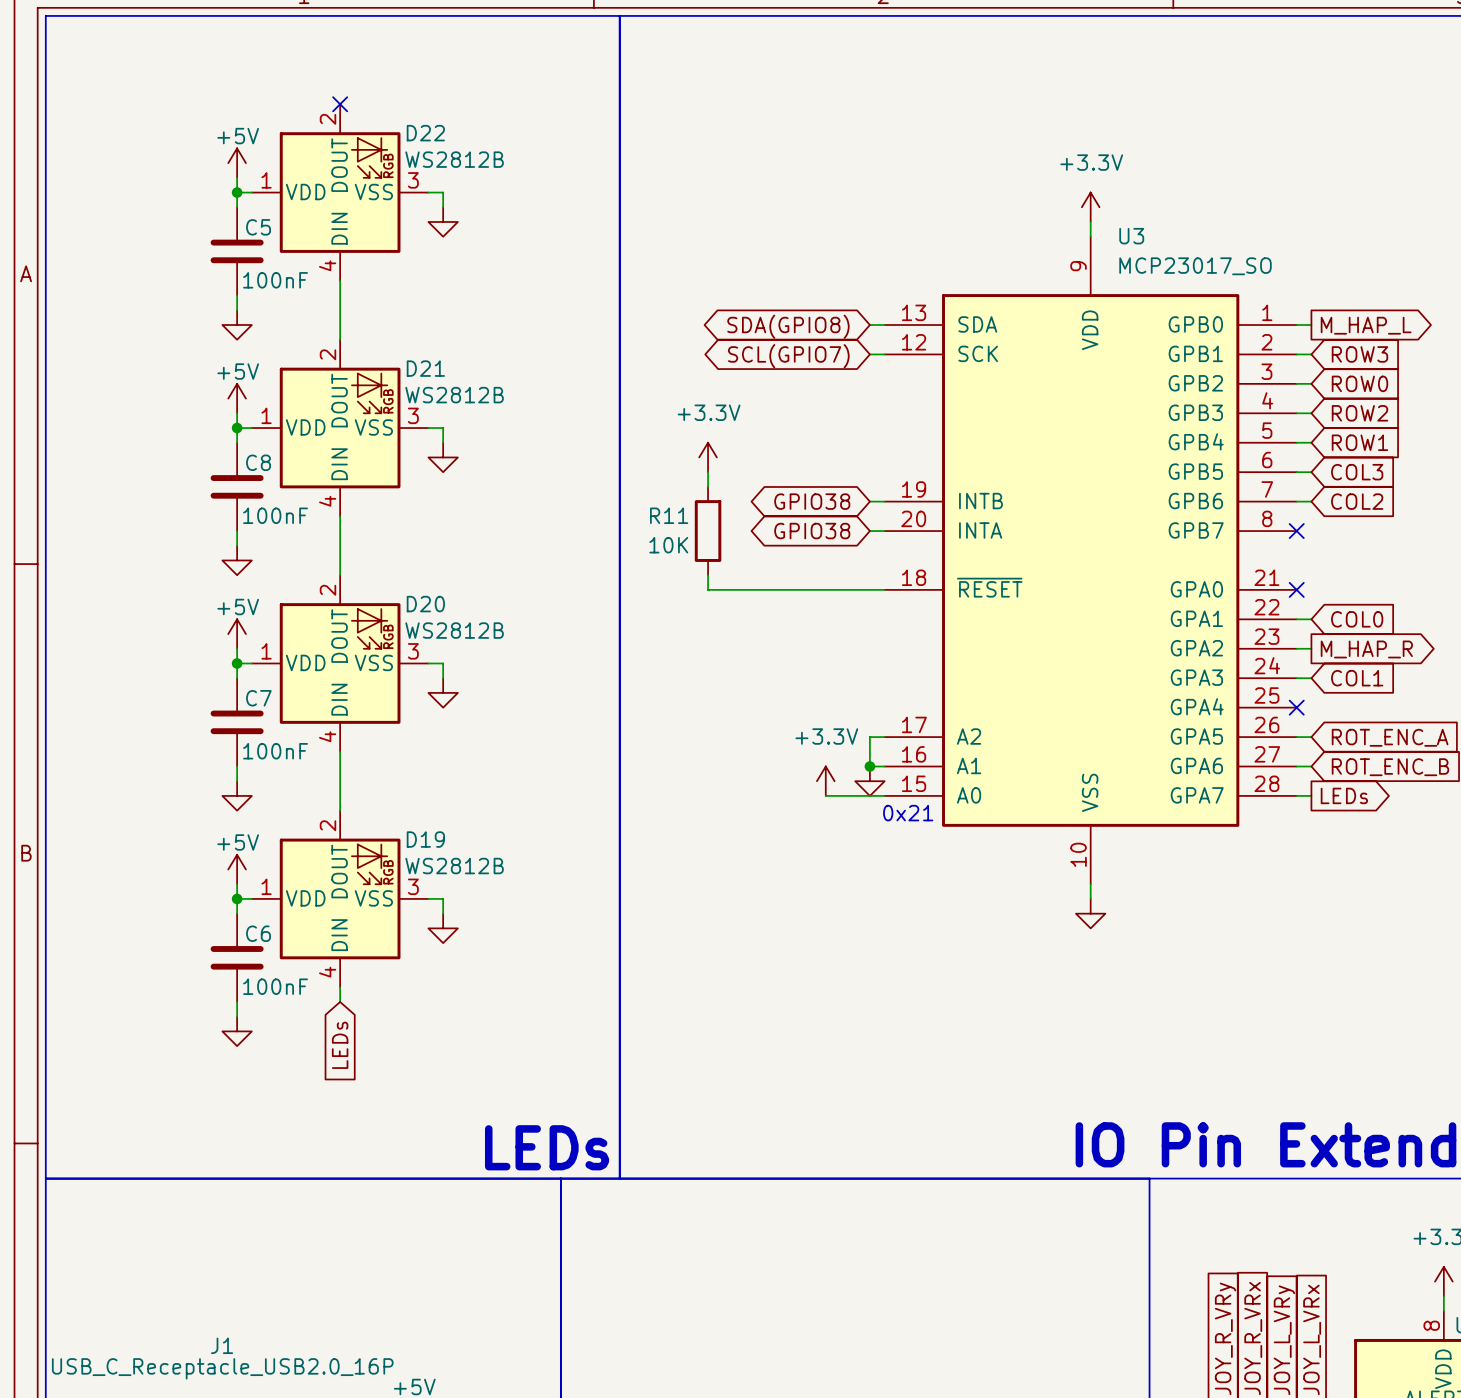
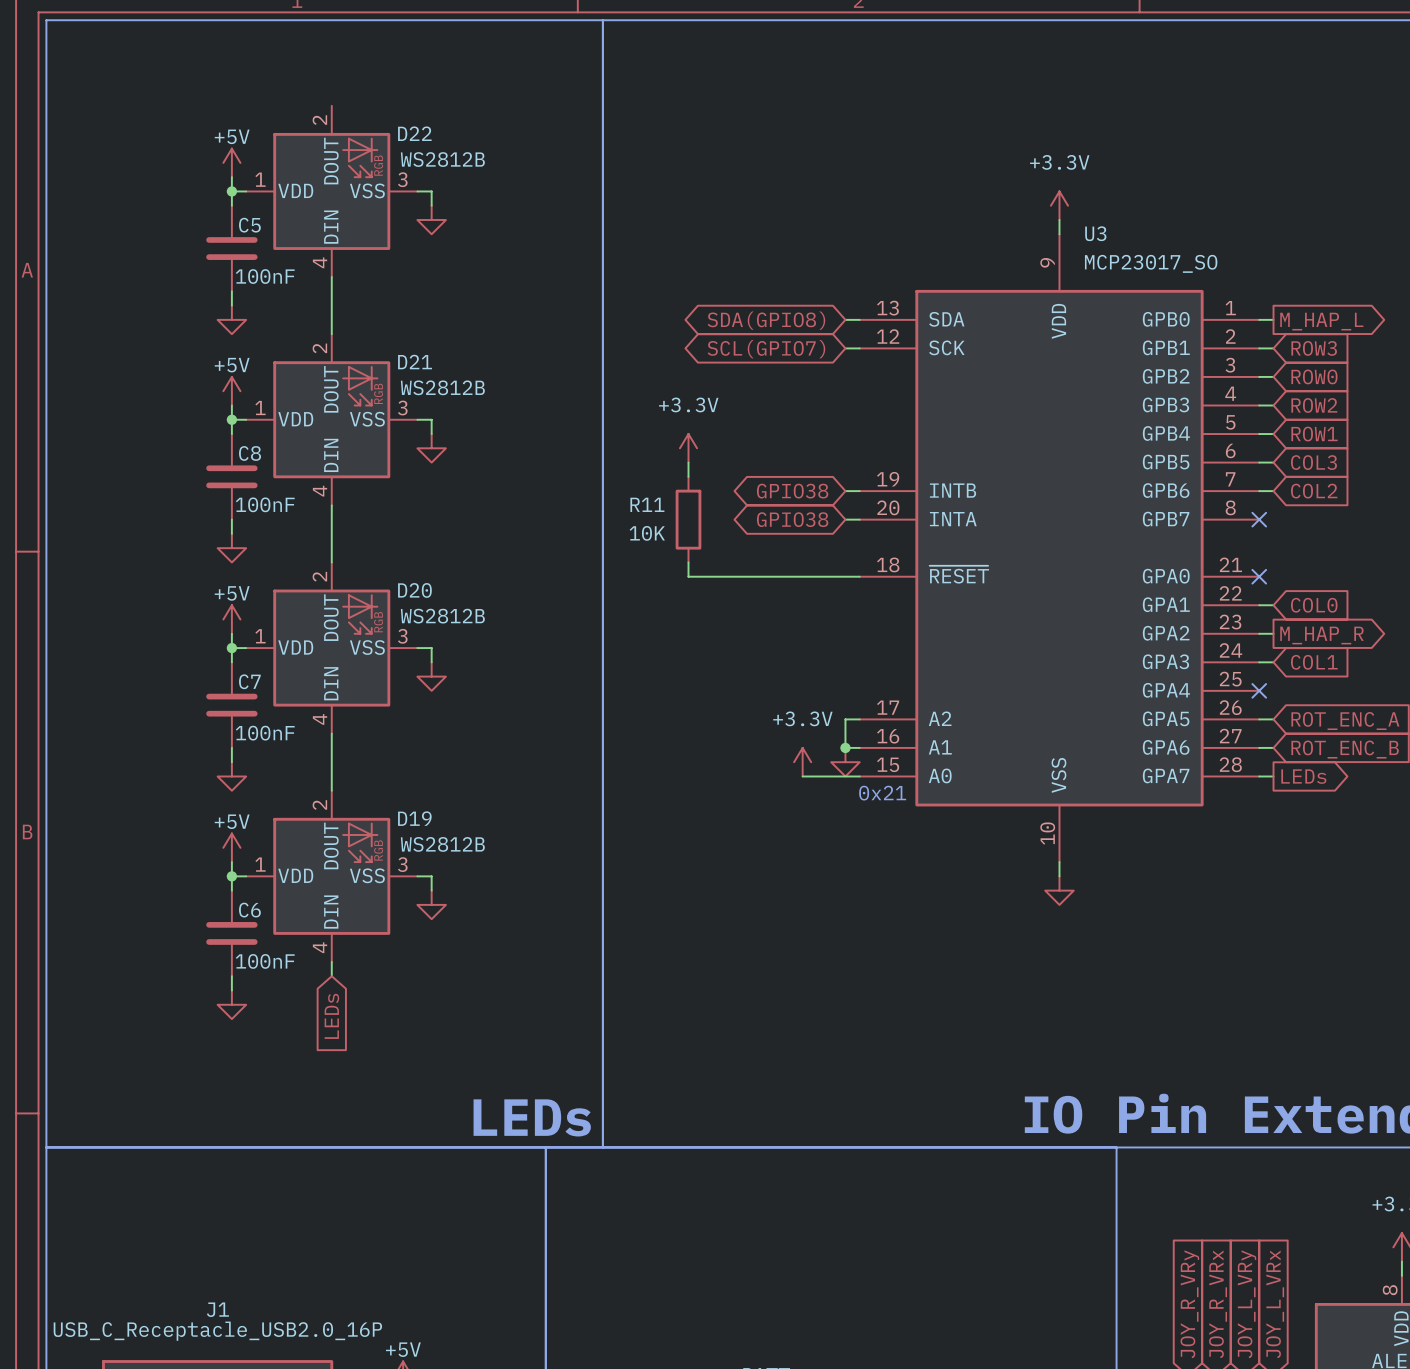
no-connect mark: (340, 104) -> none

